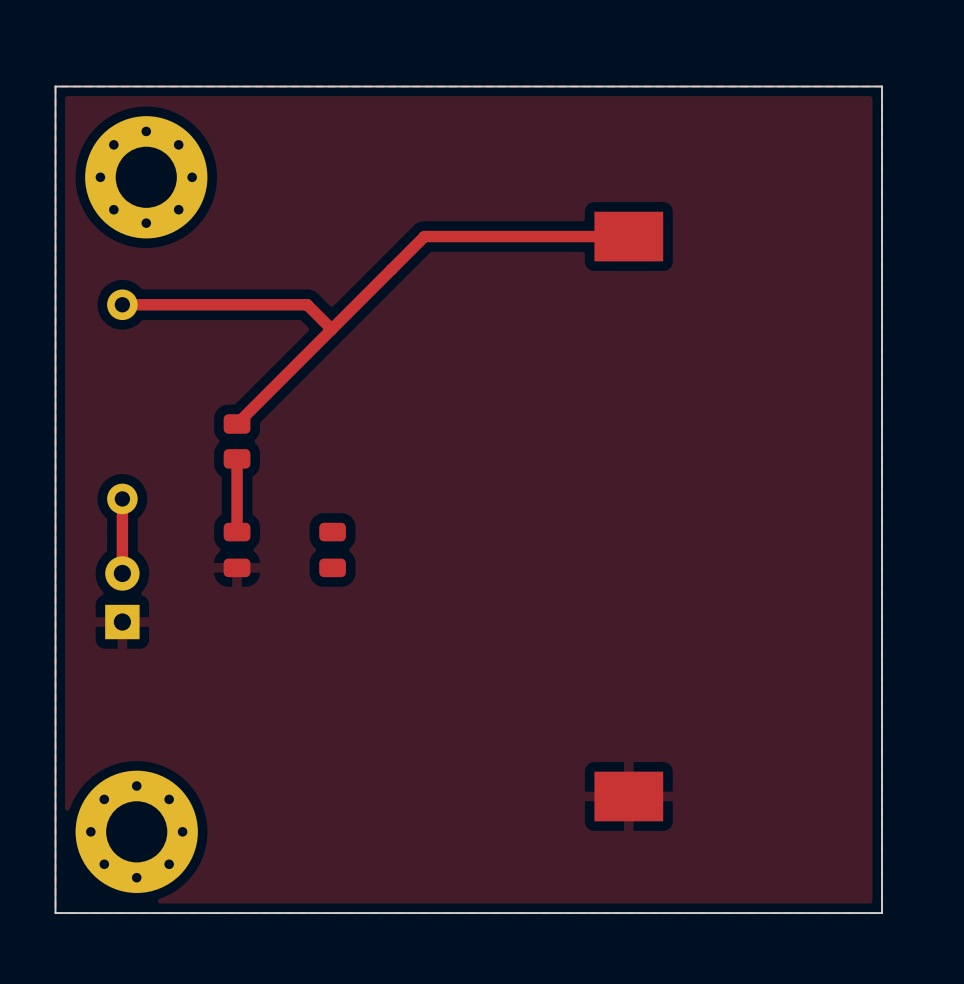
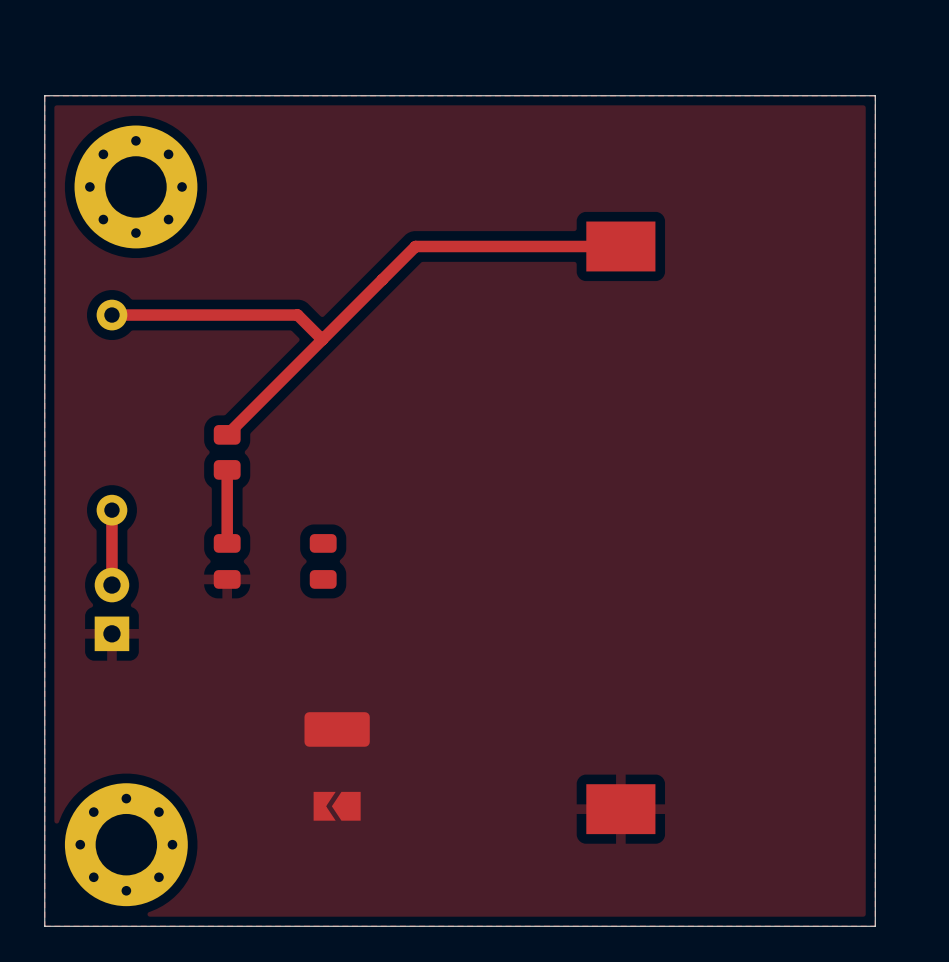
part: none -> (337, 729)
part: none -> (337, 806)

